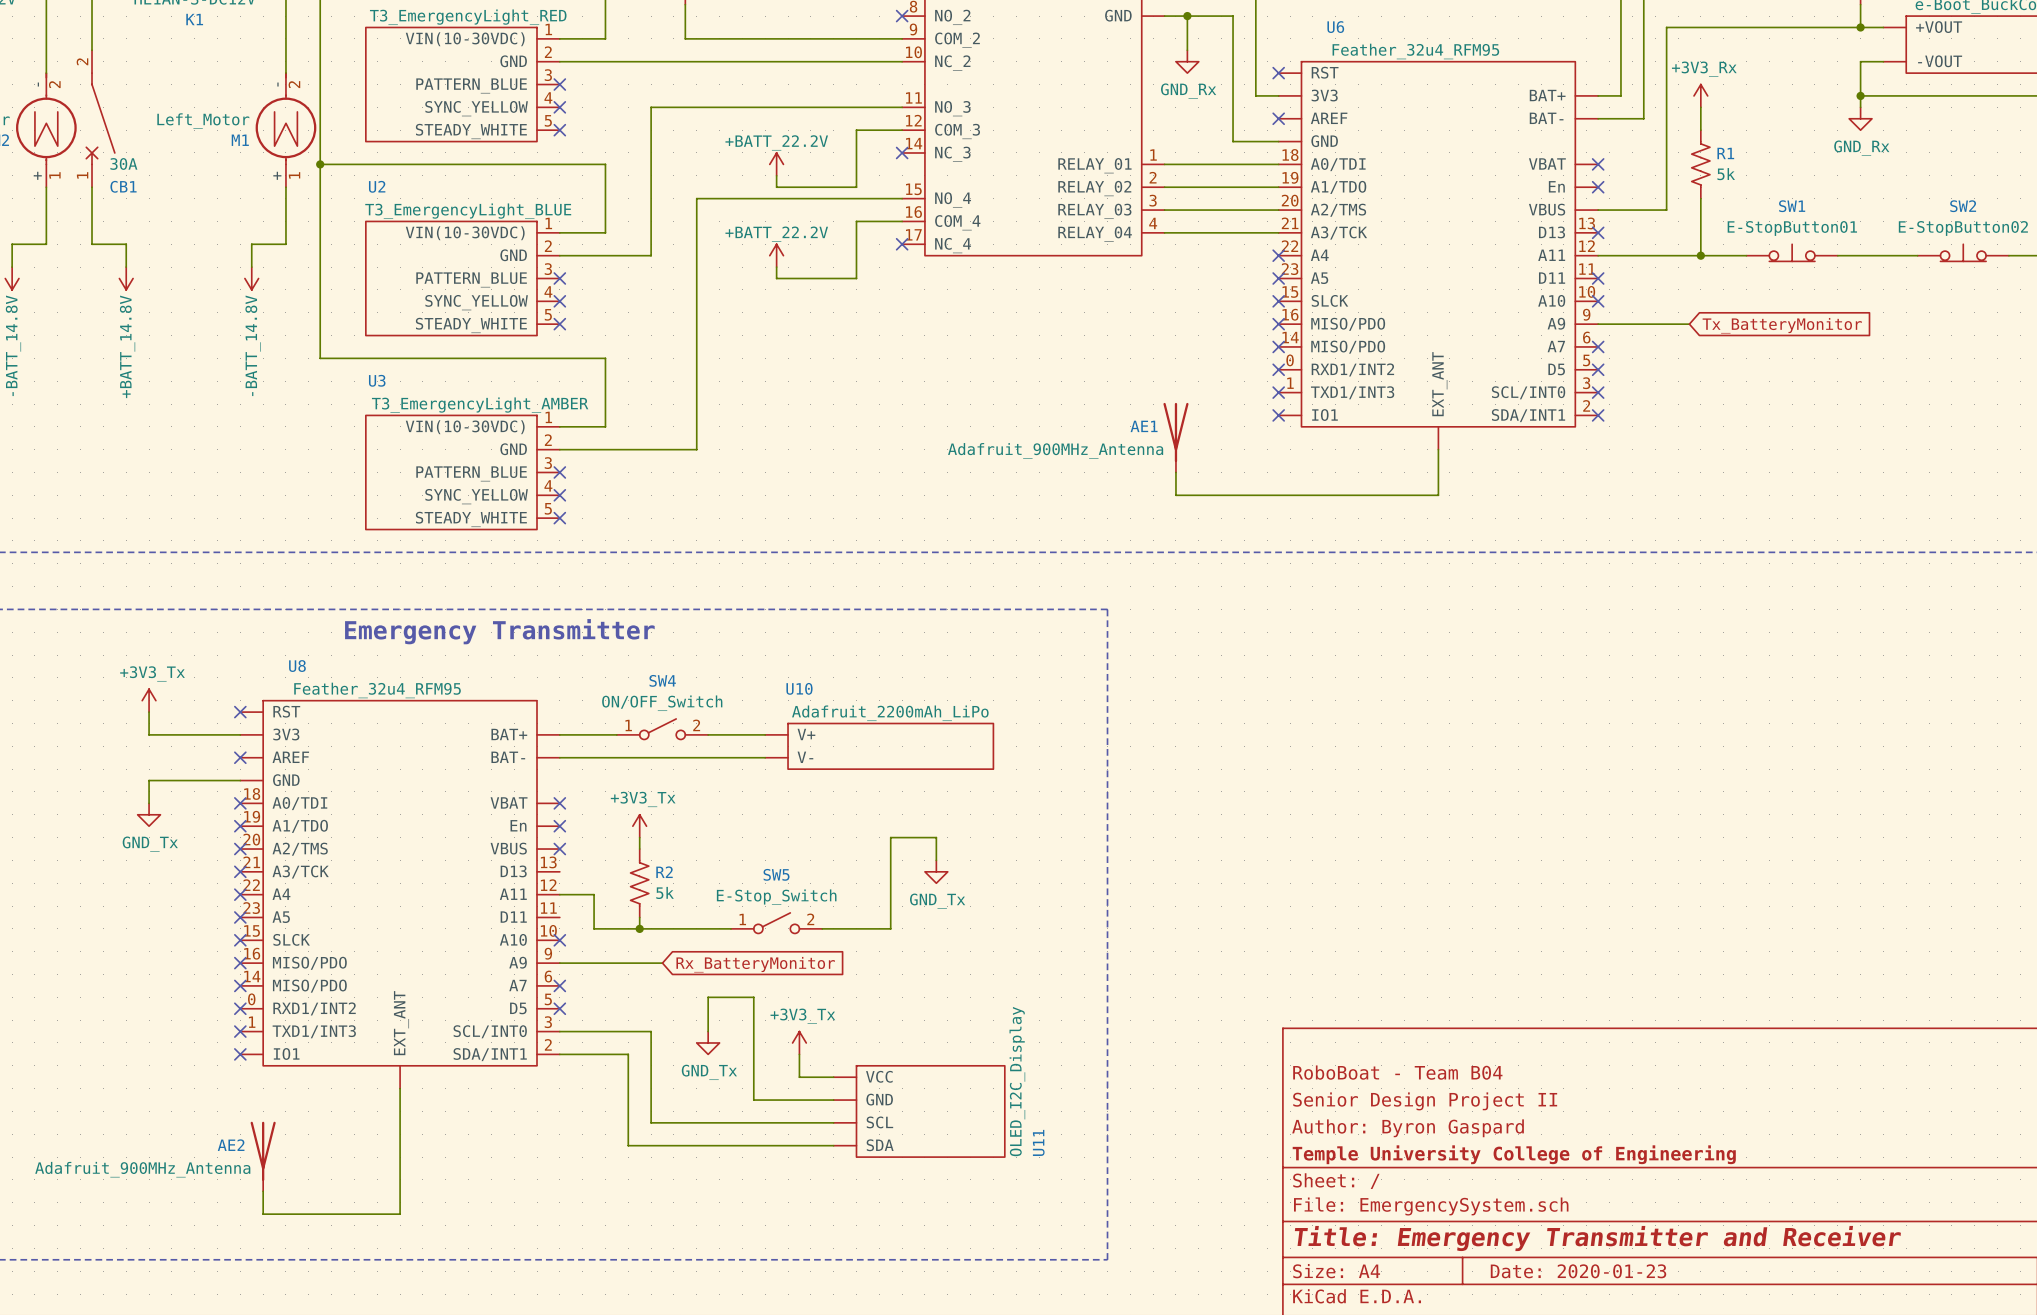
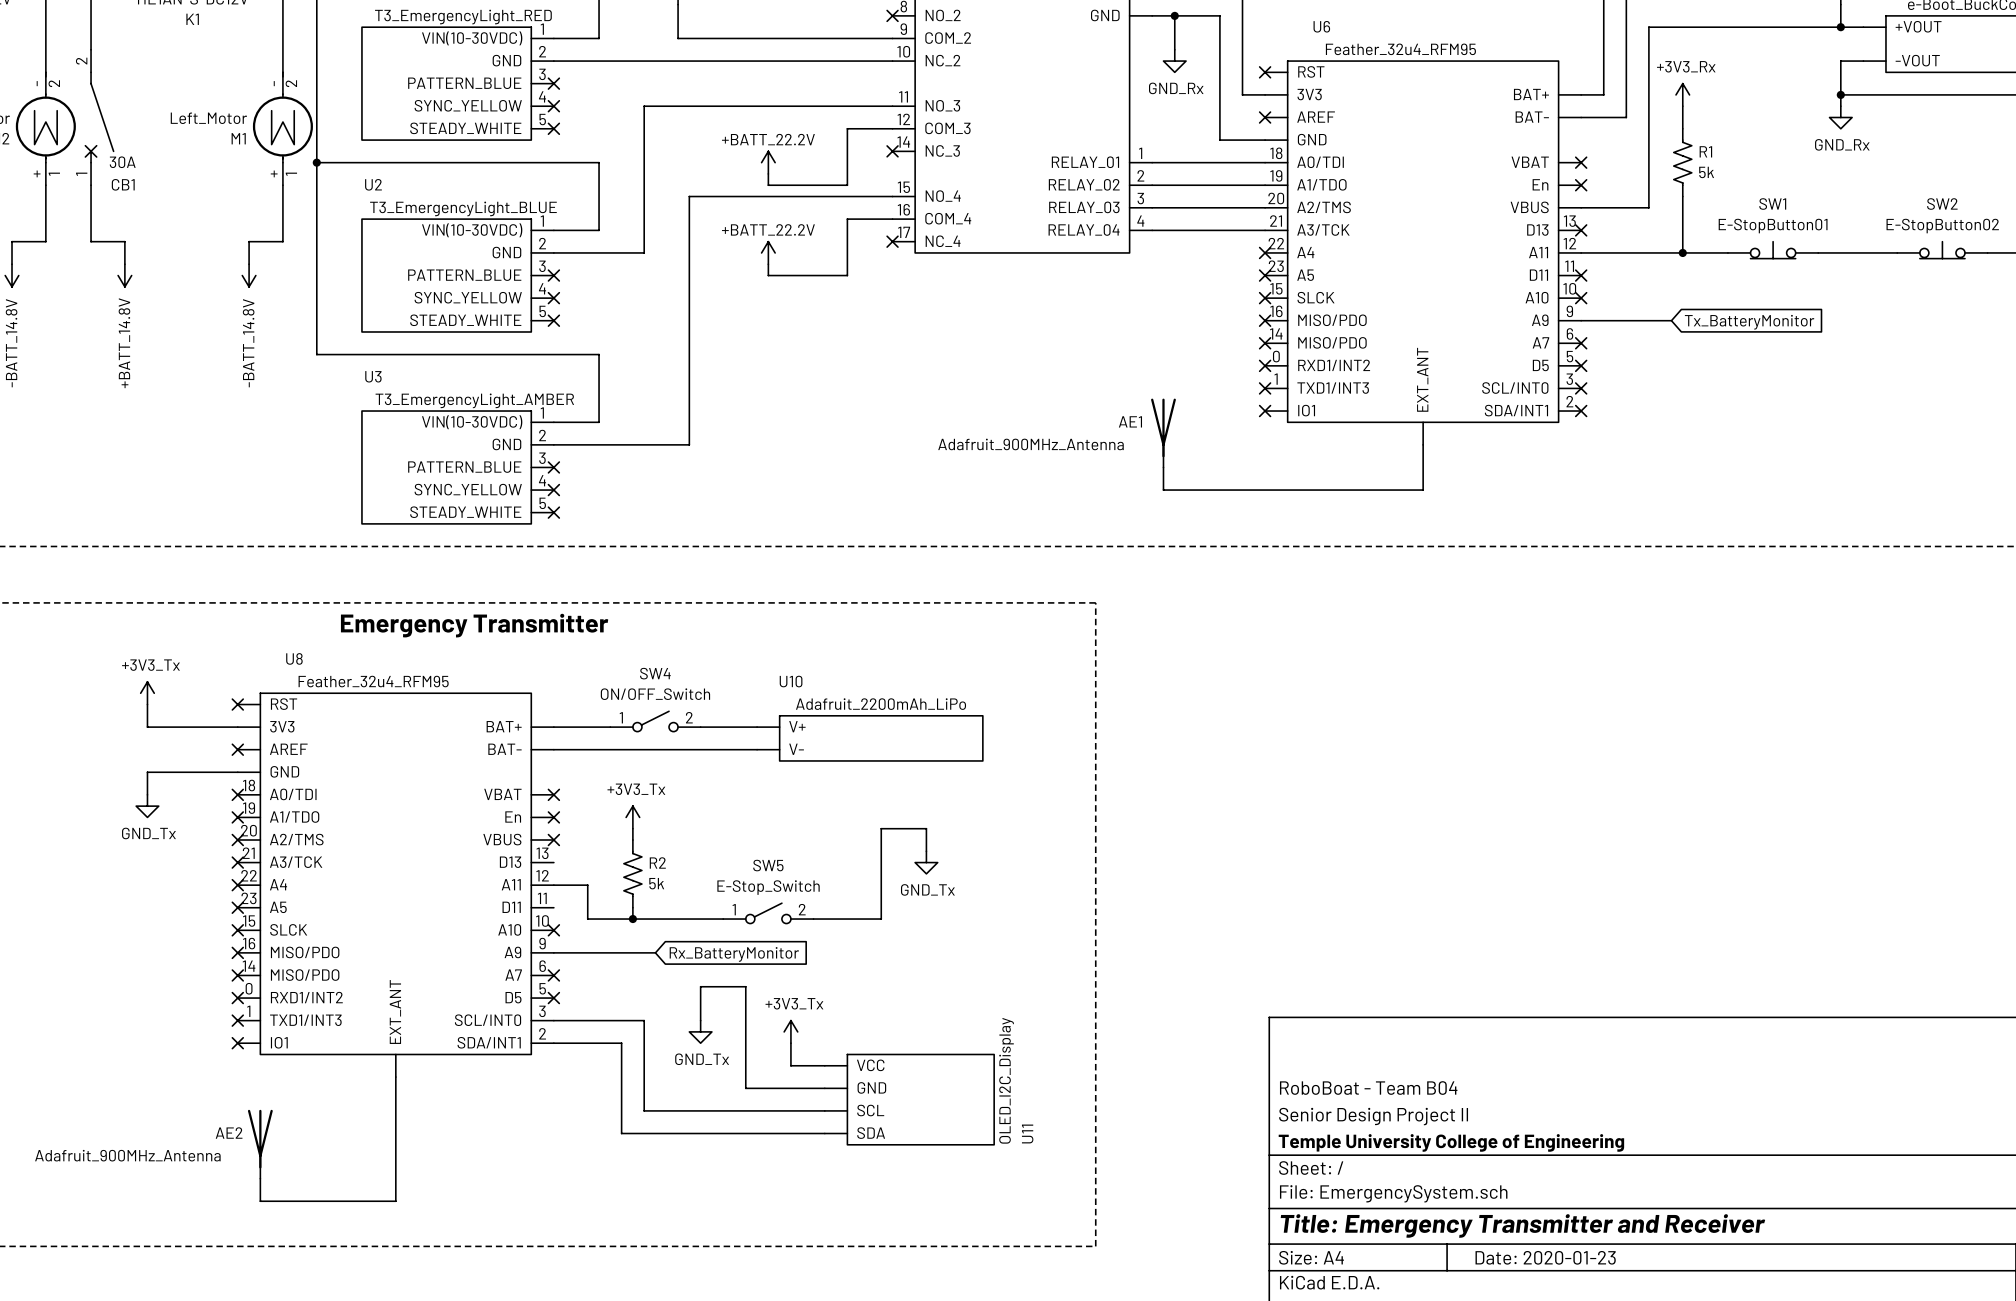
title block: RoboBoat - Team B04 (1397, 1072) -> none
title block: Senior Design Project II (1425, 1101) -> RoboBoat - Team B04 (1368, 1088)
title block: Author: Byron Gaspard (1408, 1128) -> Senior Design Project II (1373, 1116)

